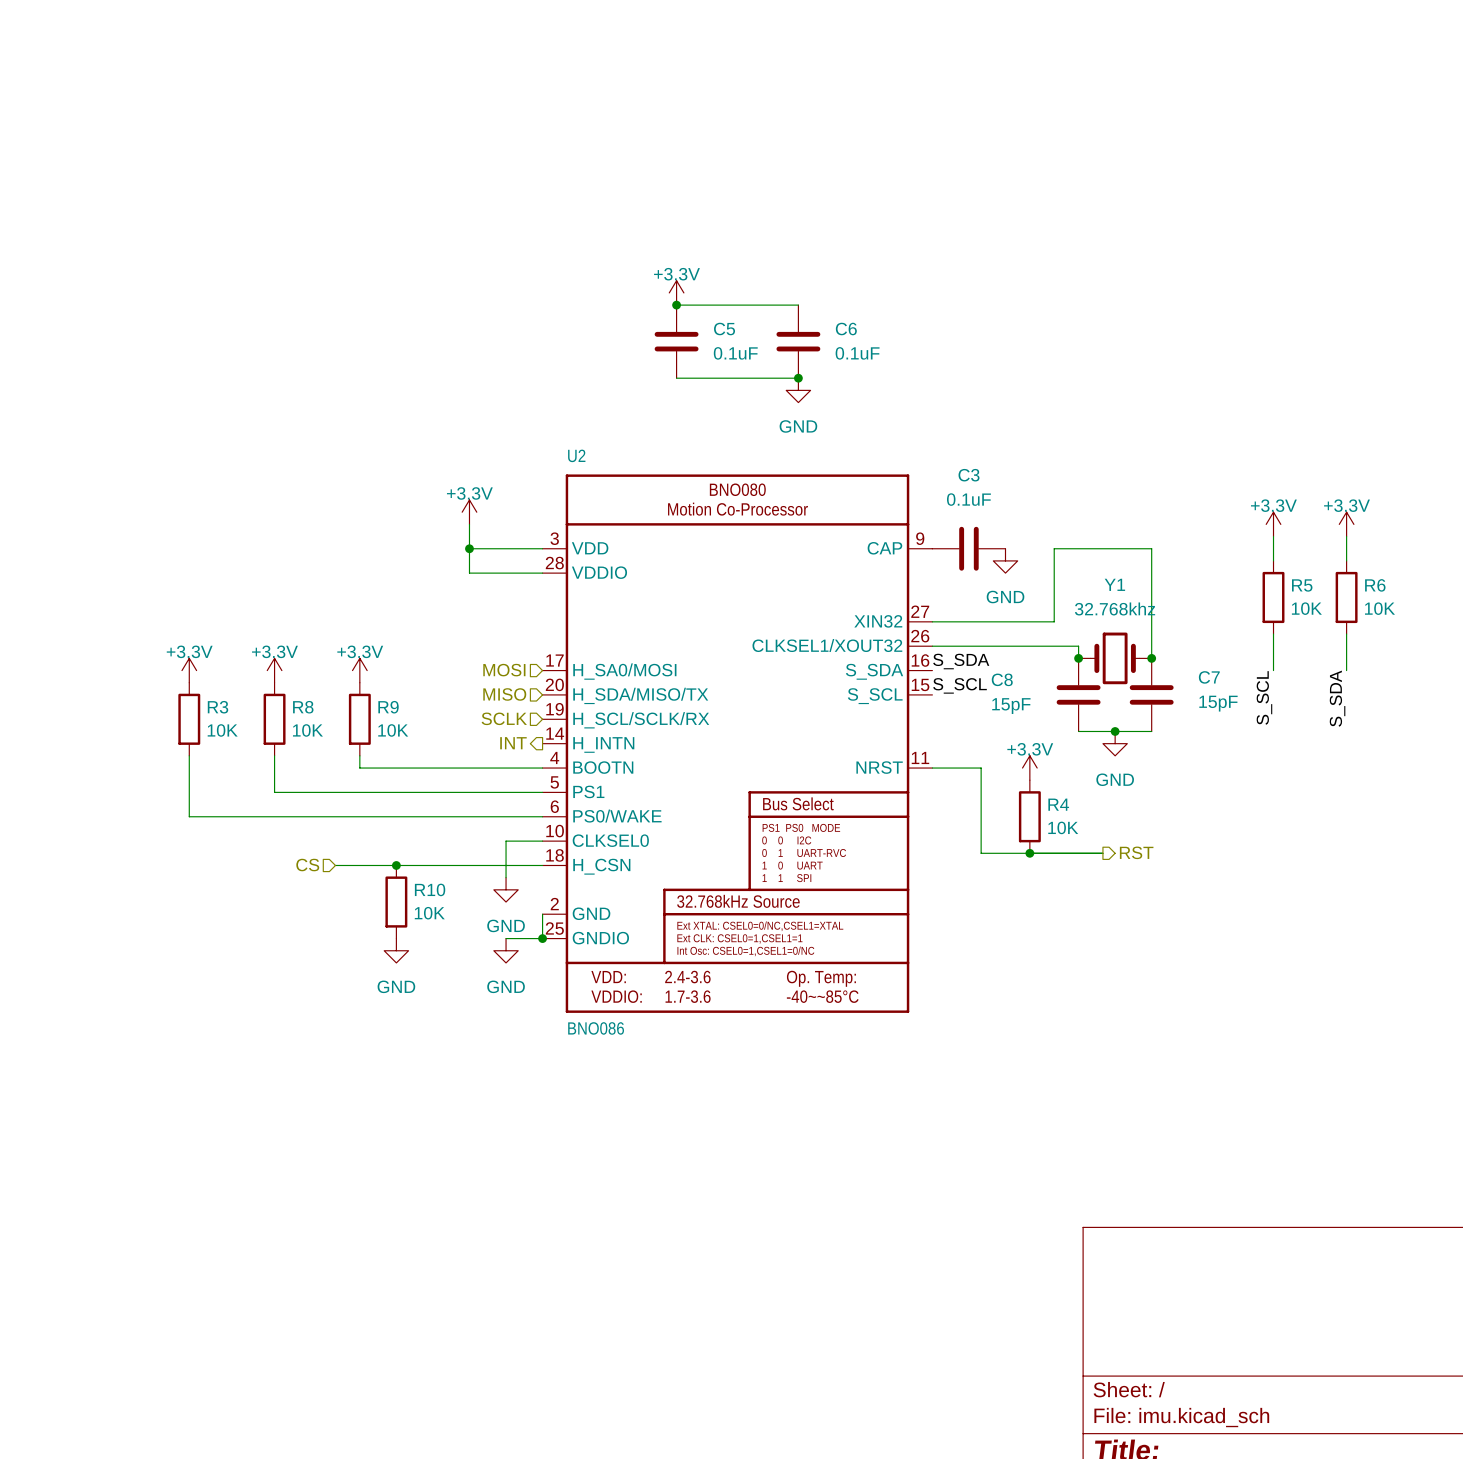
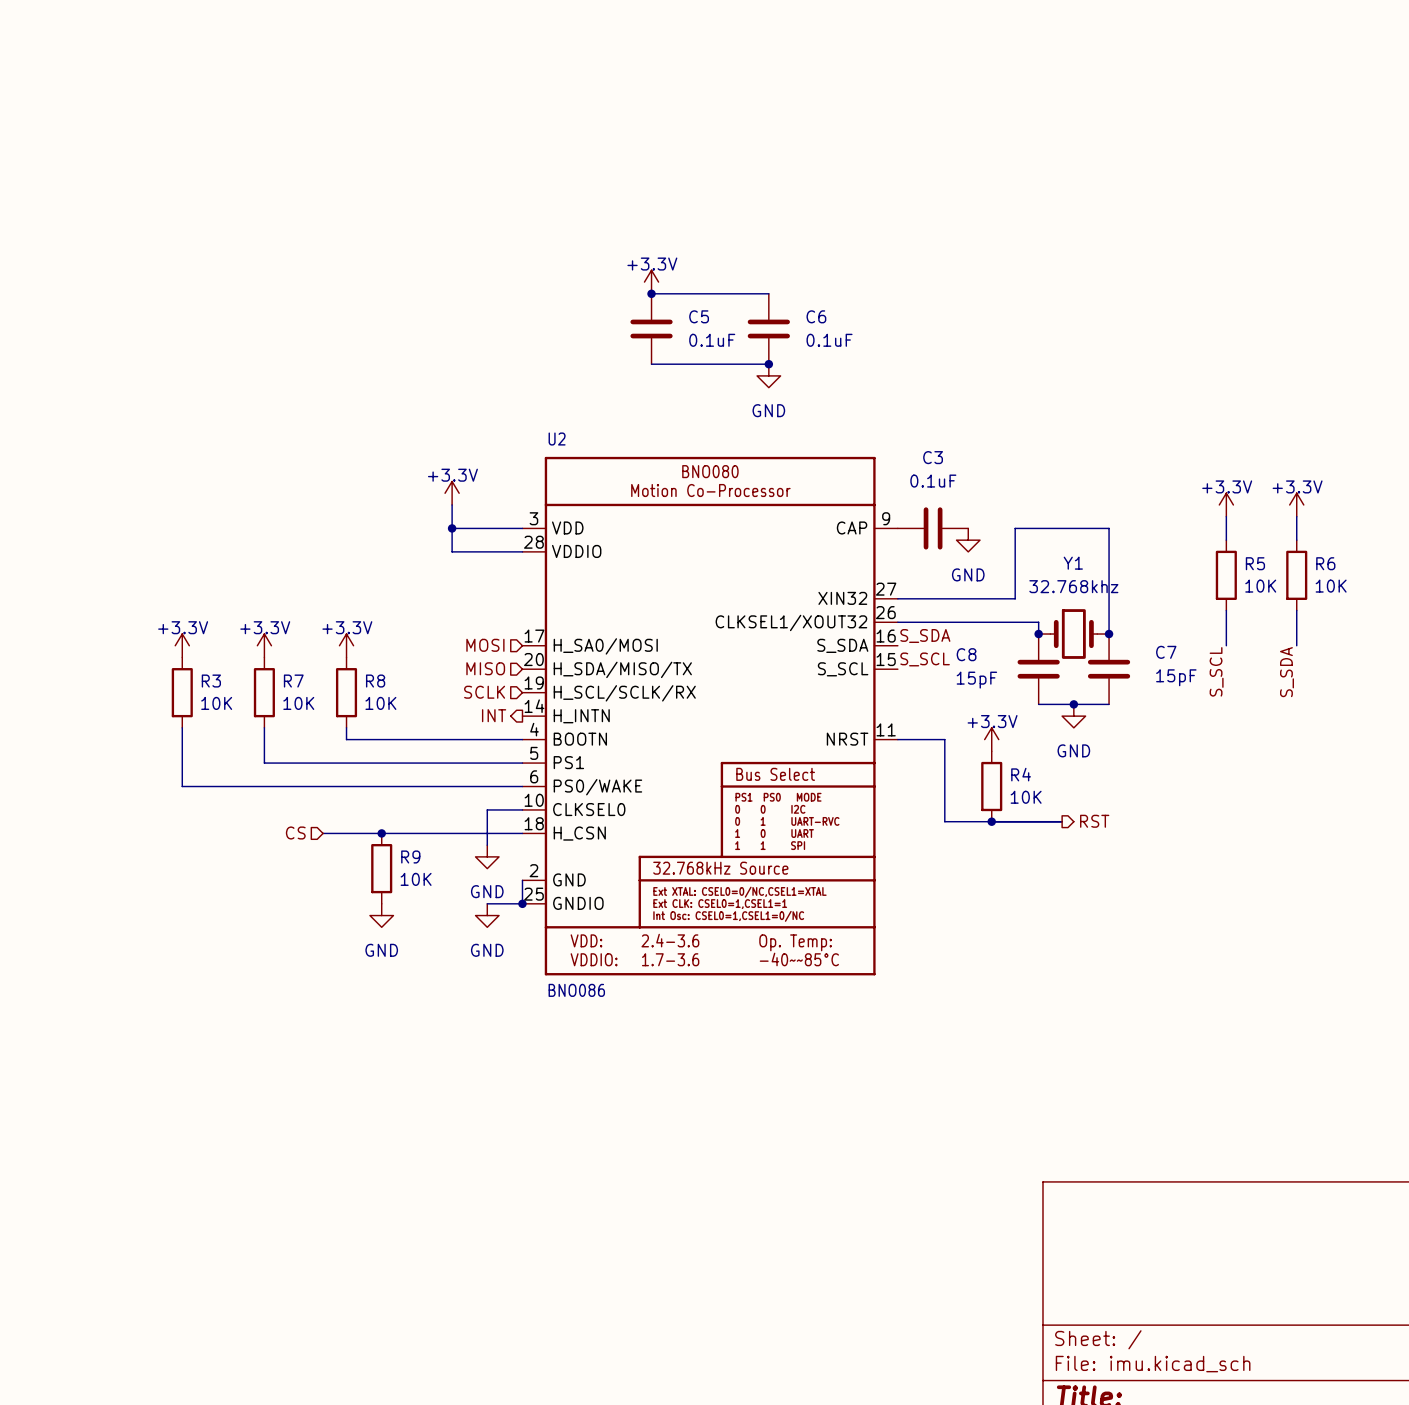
R8 name: R8 (303, 707) -> R7 (293, 681)
R9 name: R9 (388, 707) -> R8 (375, 681)
R10 name: R10 (430, 889) -> R9 (410, 856)

